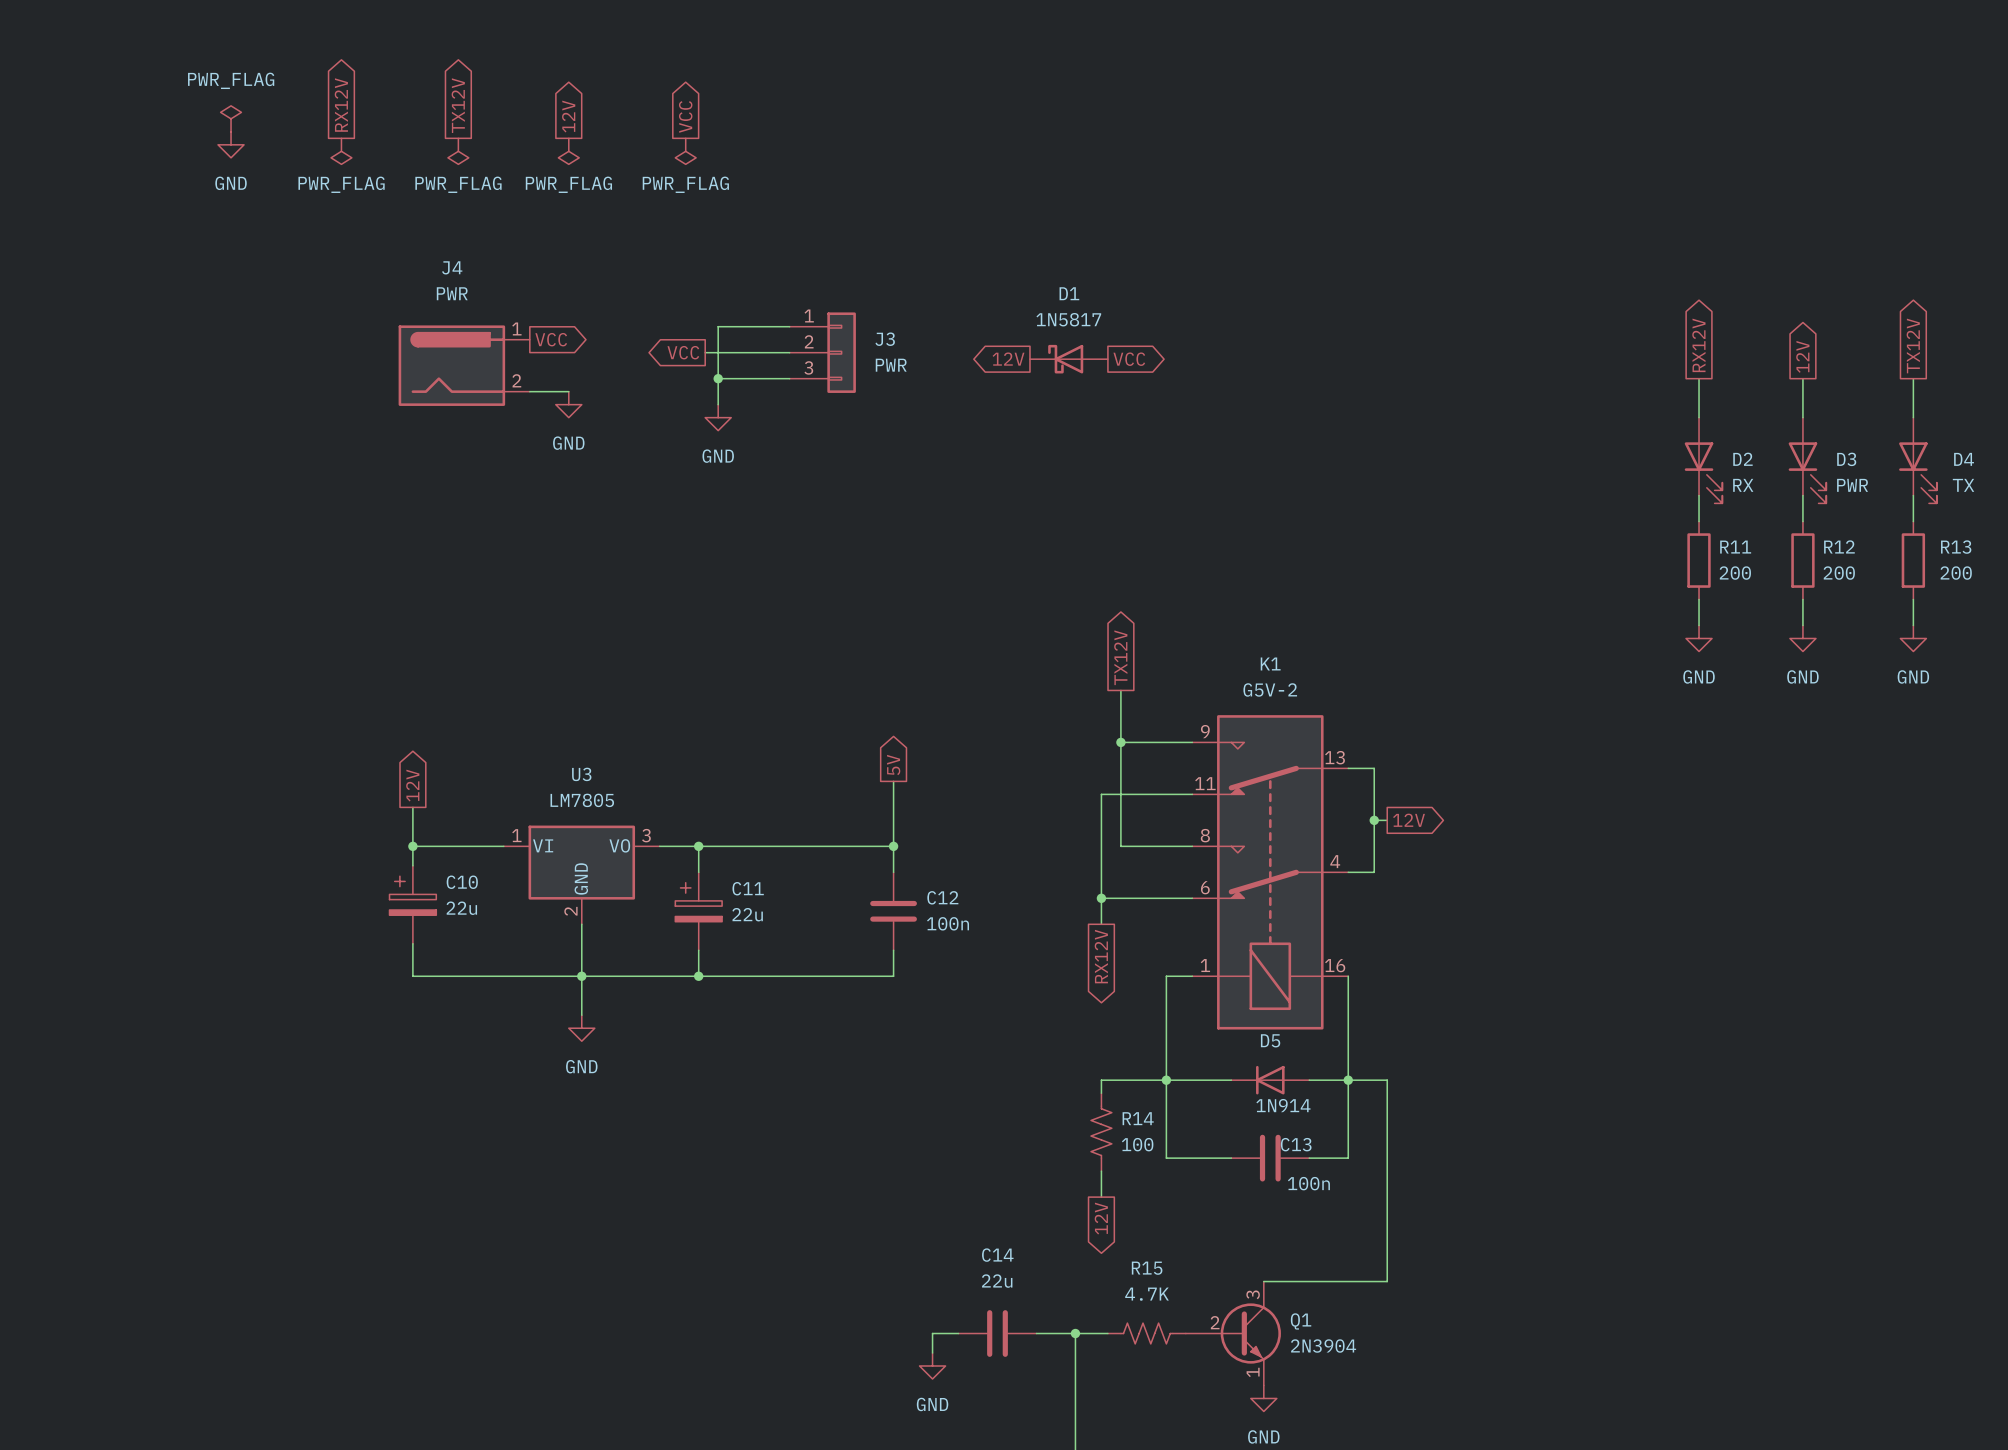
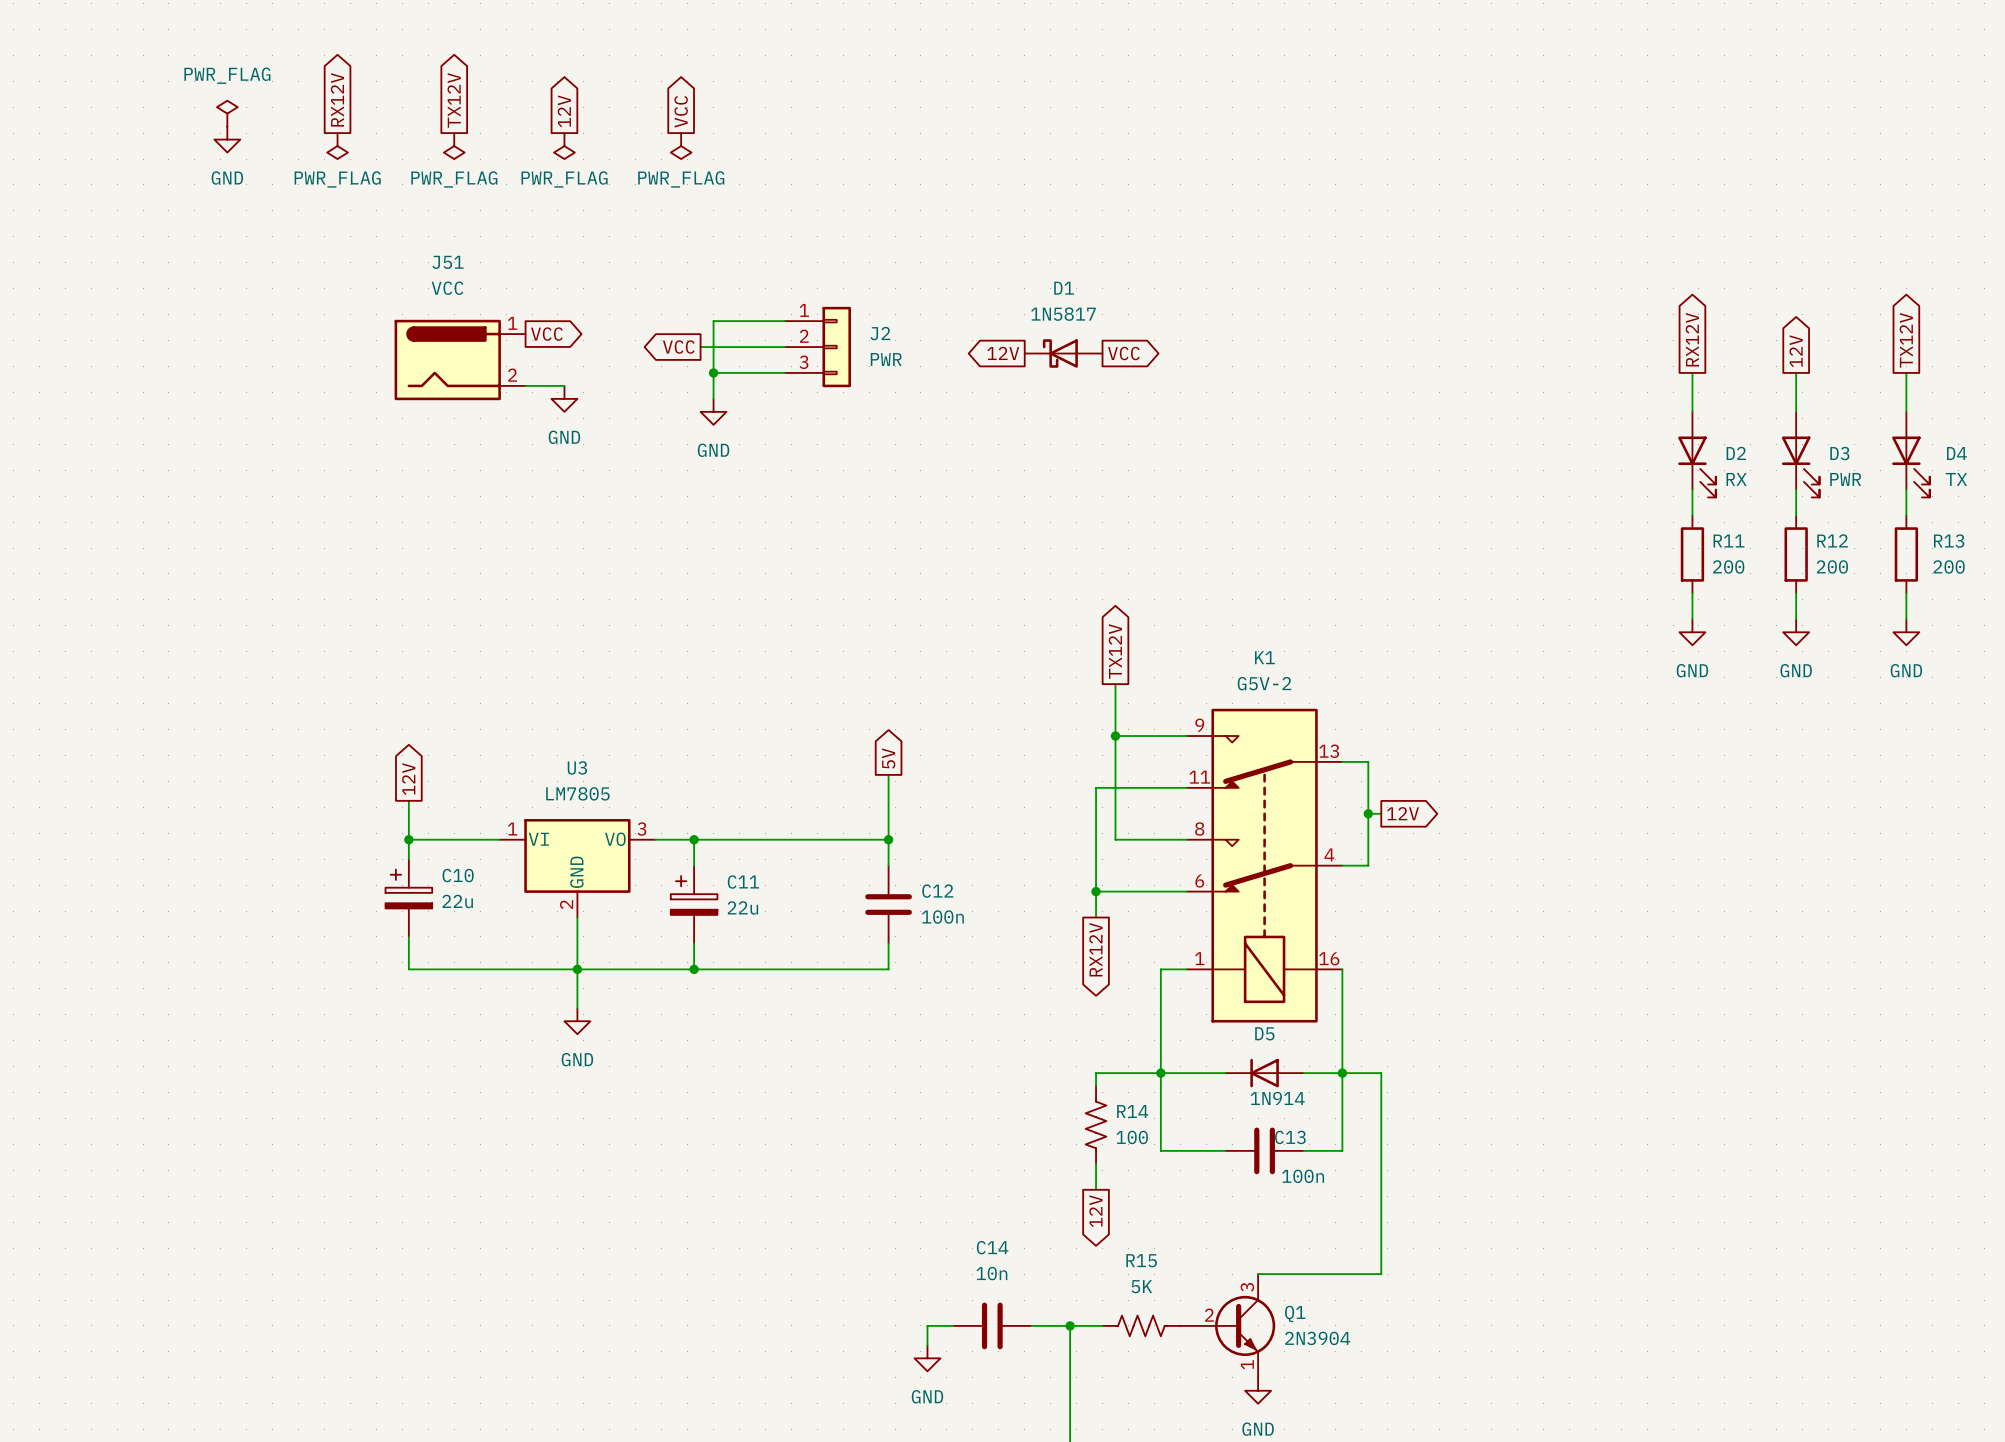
J4 name: J4 (452, 267) -> J51 (448, 262)
J4 value: PWR (452, 293) -> VCC (447, 288)
J3 name: J3 (885, 339) -> J2 (880, 333)
C14 value: 22u (997, 1281) -> 10n (991, 1273)
R15 value: 4.7K (1147, 1294) -> 5K (1141, 1286)

